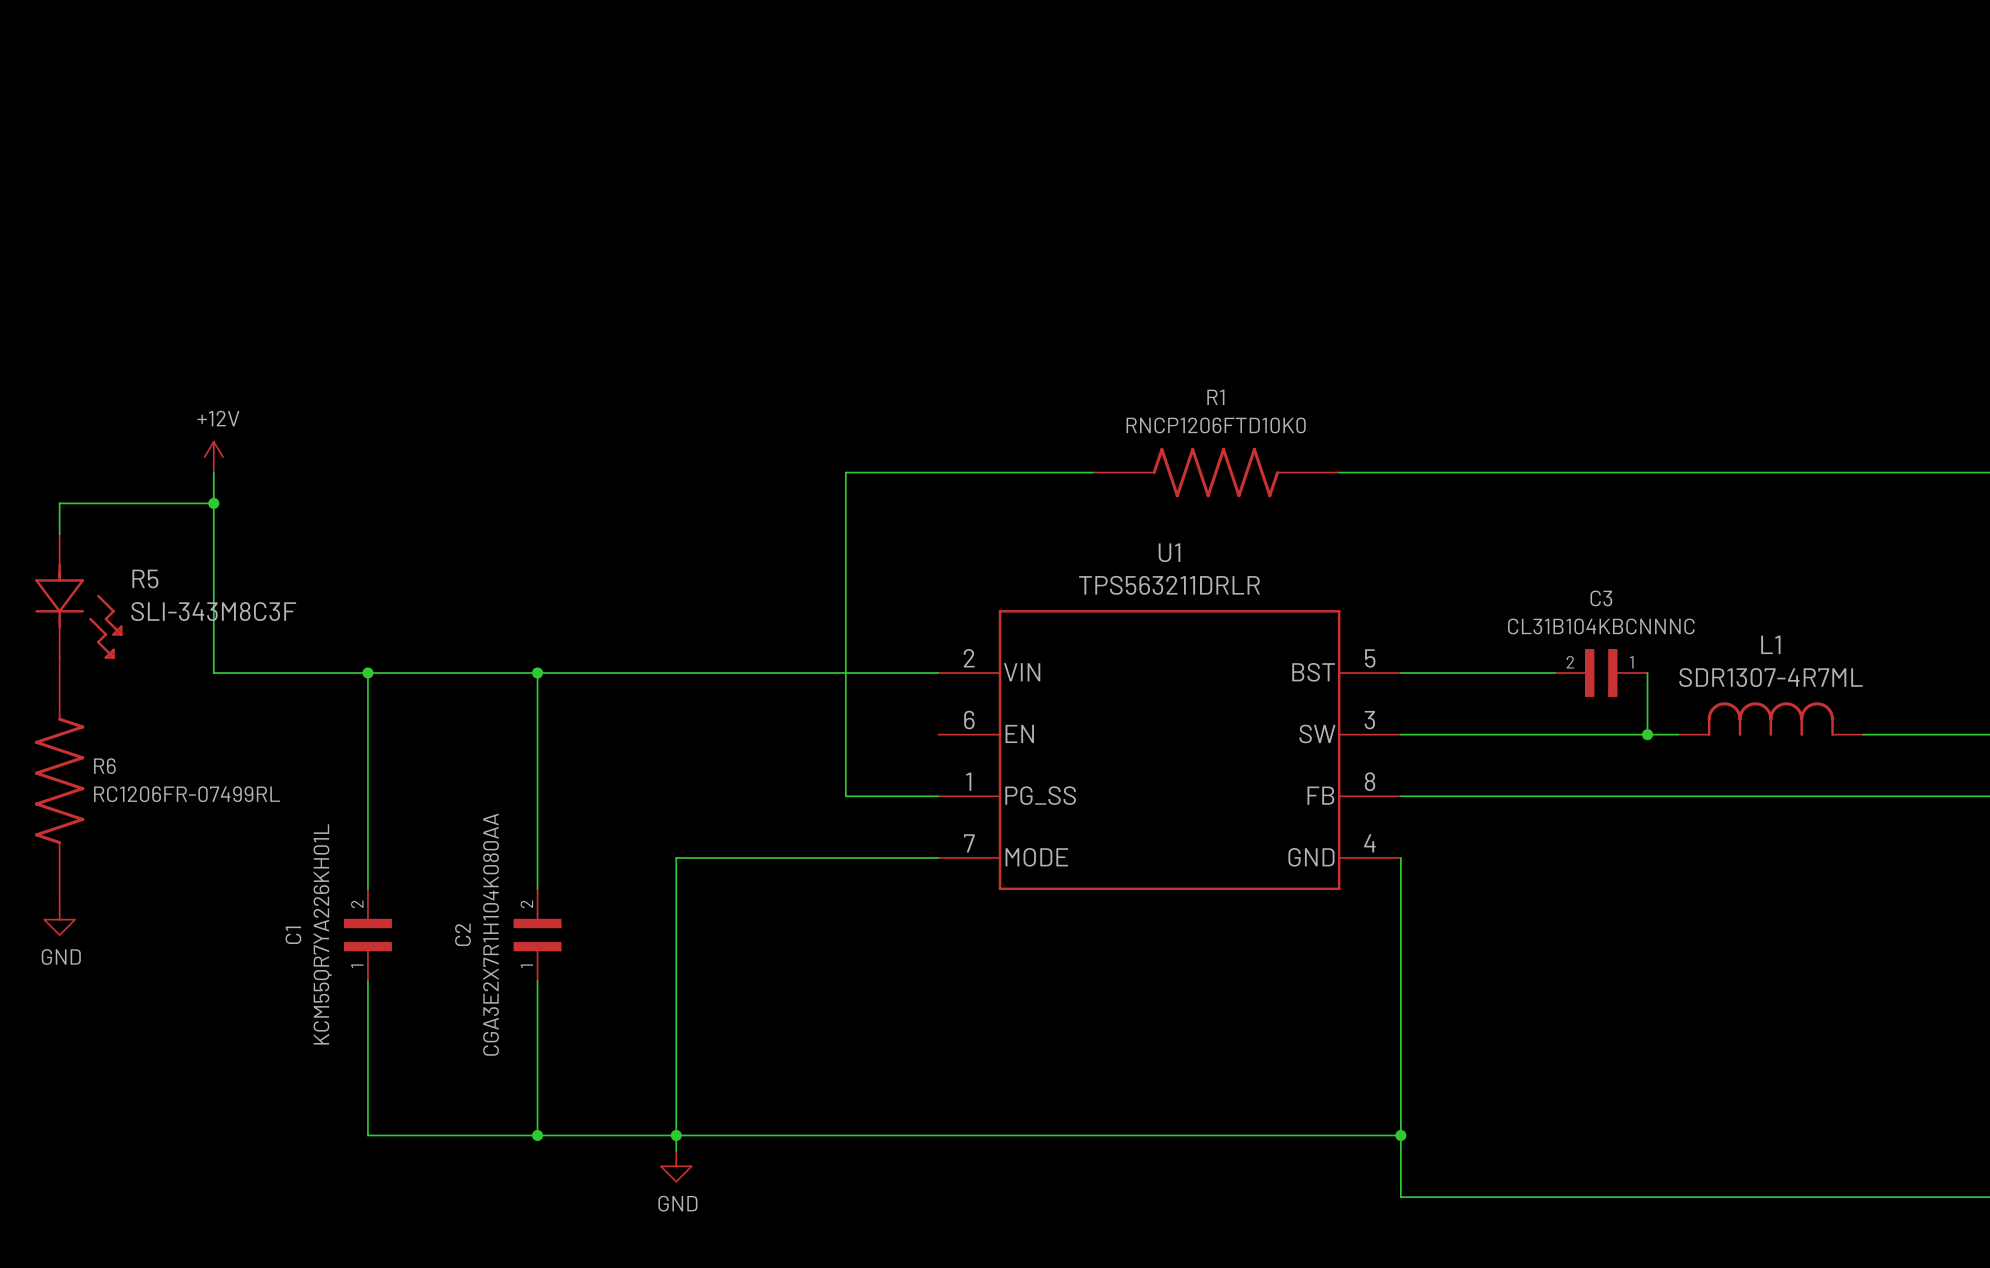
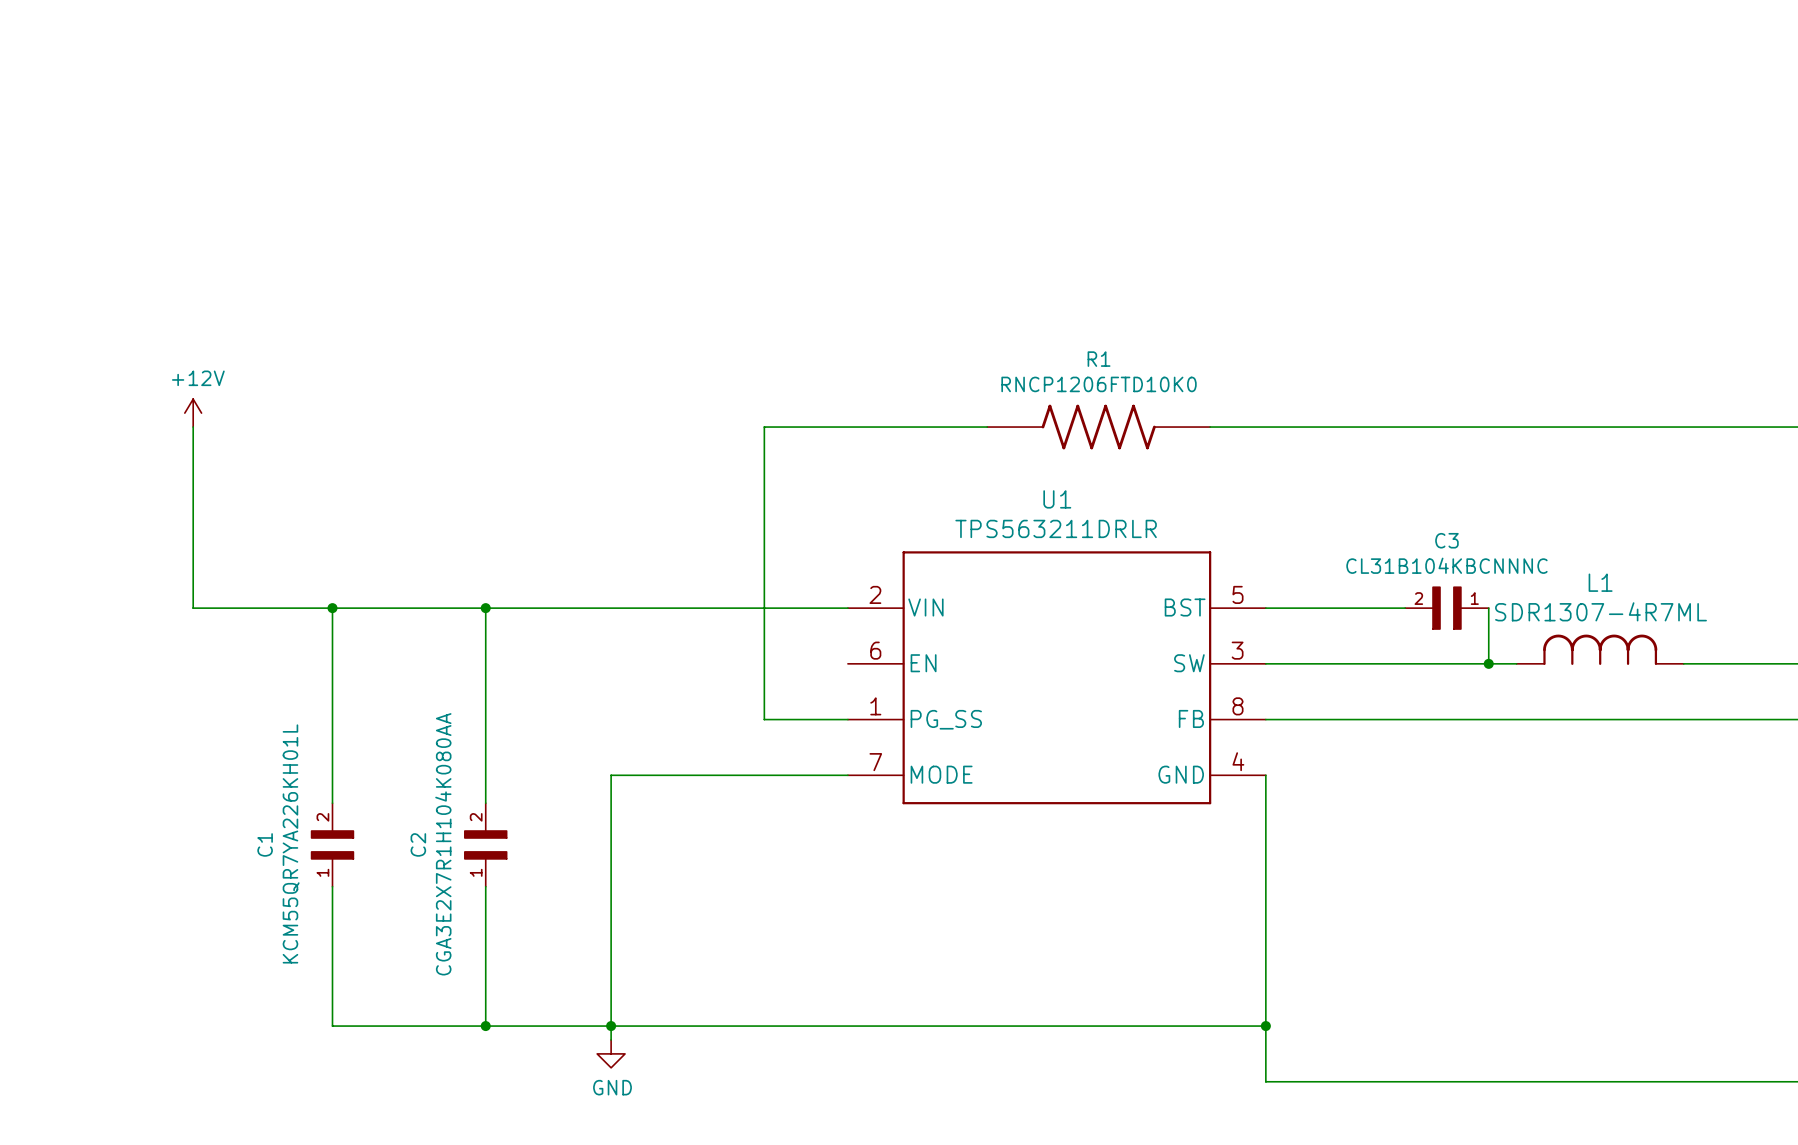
wire: (213, 503) (59, 503) (59, 534) -> none
junction: (213, 503) -> none
R5: SLI-343M8C3F (78, 596) -> none
R6: RC1206FR-07499RL (59, 780) -> none
power symbol: GND (59, 919) -> none

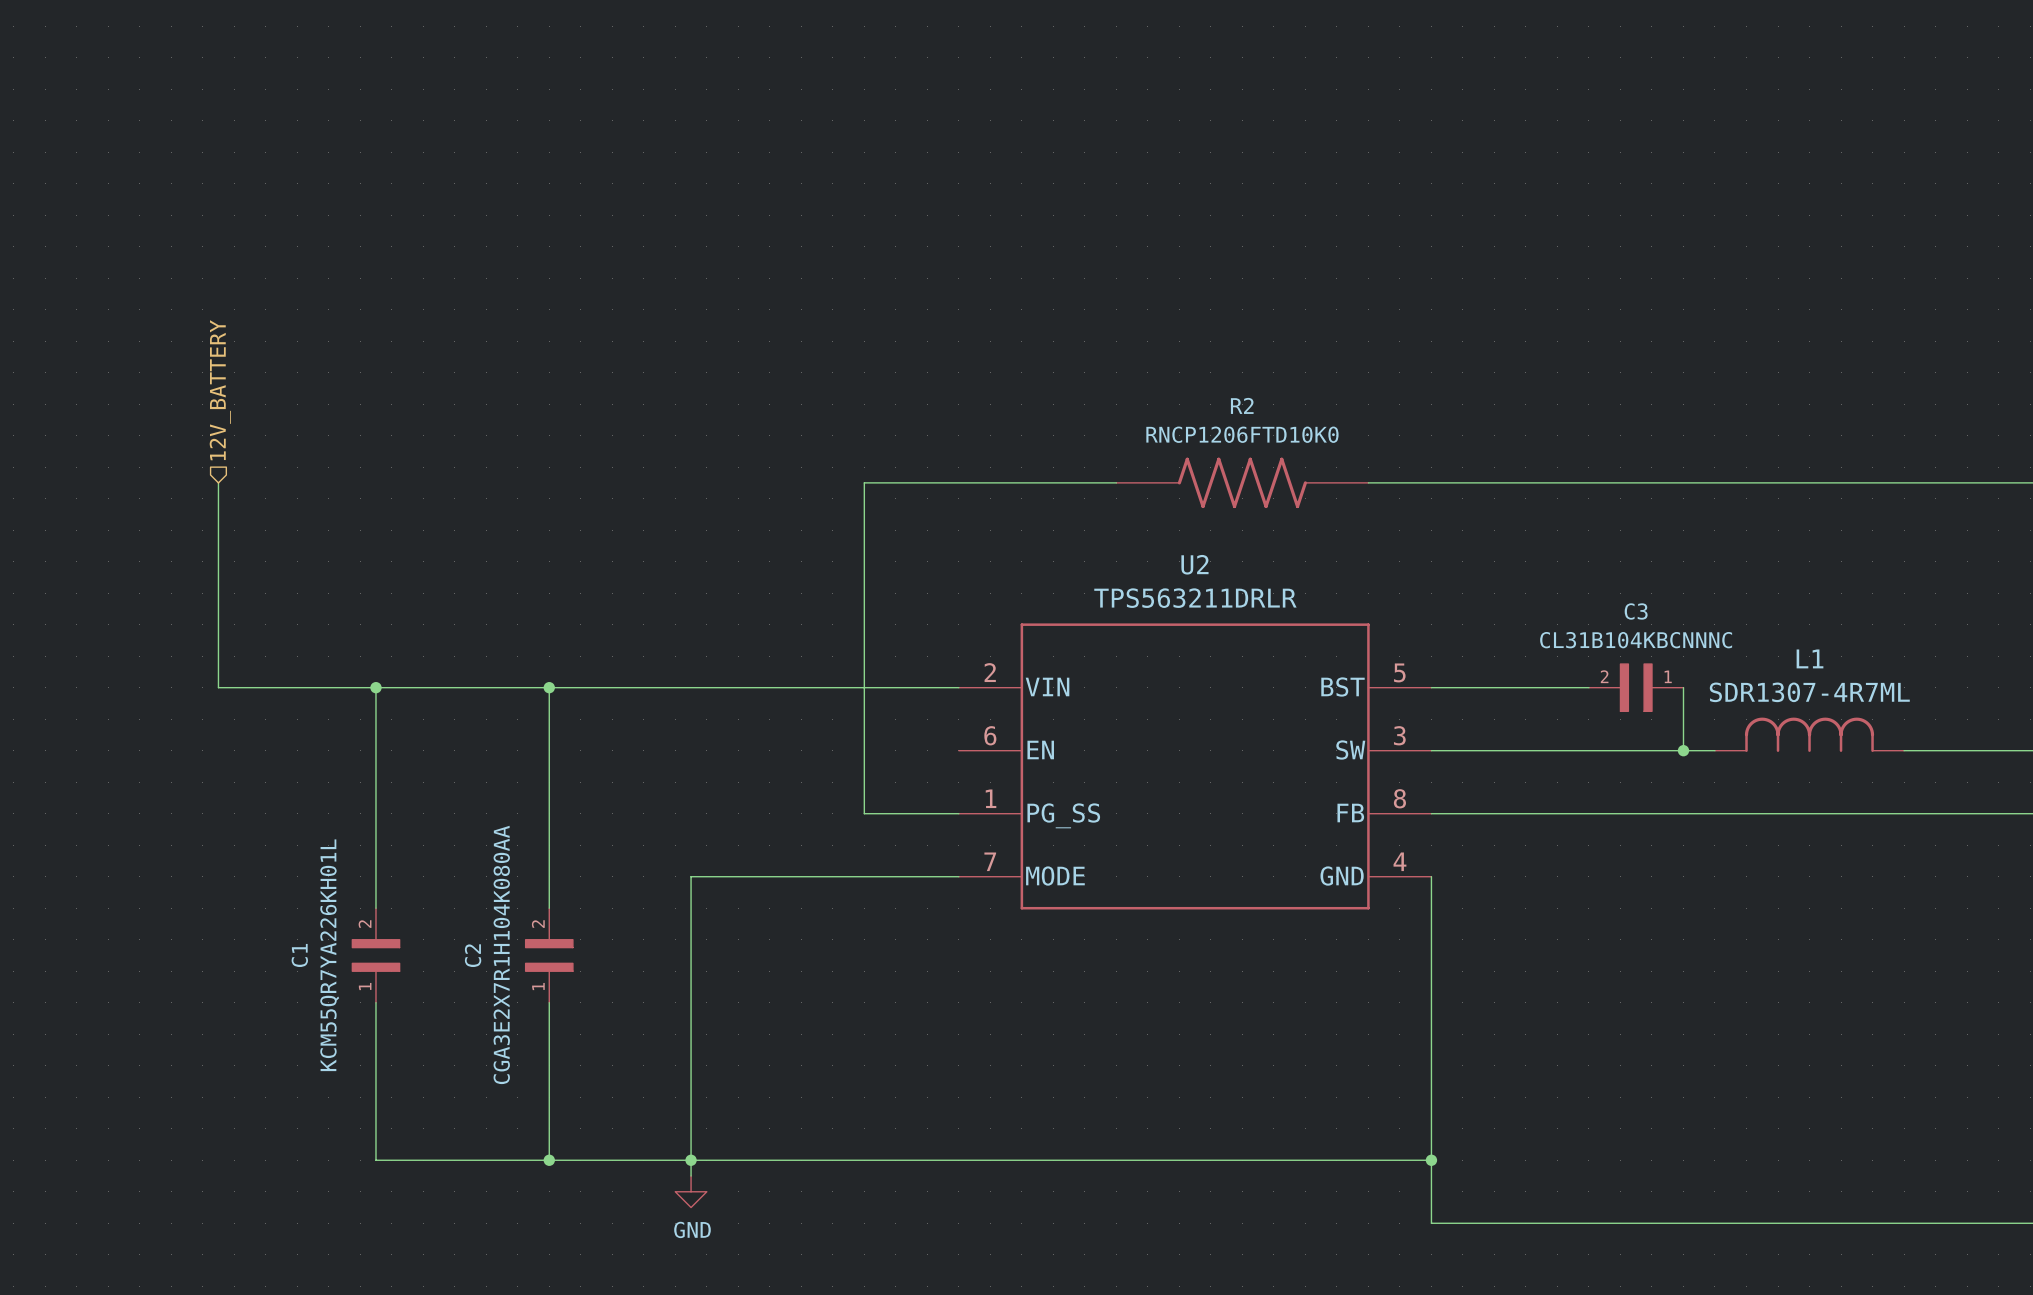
hierarchical label: none -> 12V_BATTERY (220, 390)
R1 name: R1 (1099, 359) -> R2 (1242, 405)
power symbol: +12V (193, 413) -> none
U1 name: U1 (1057, 499) -> U2 (1194, 564)

